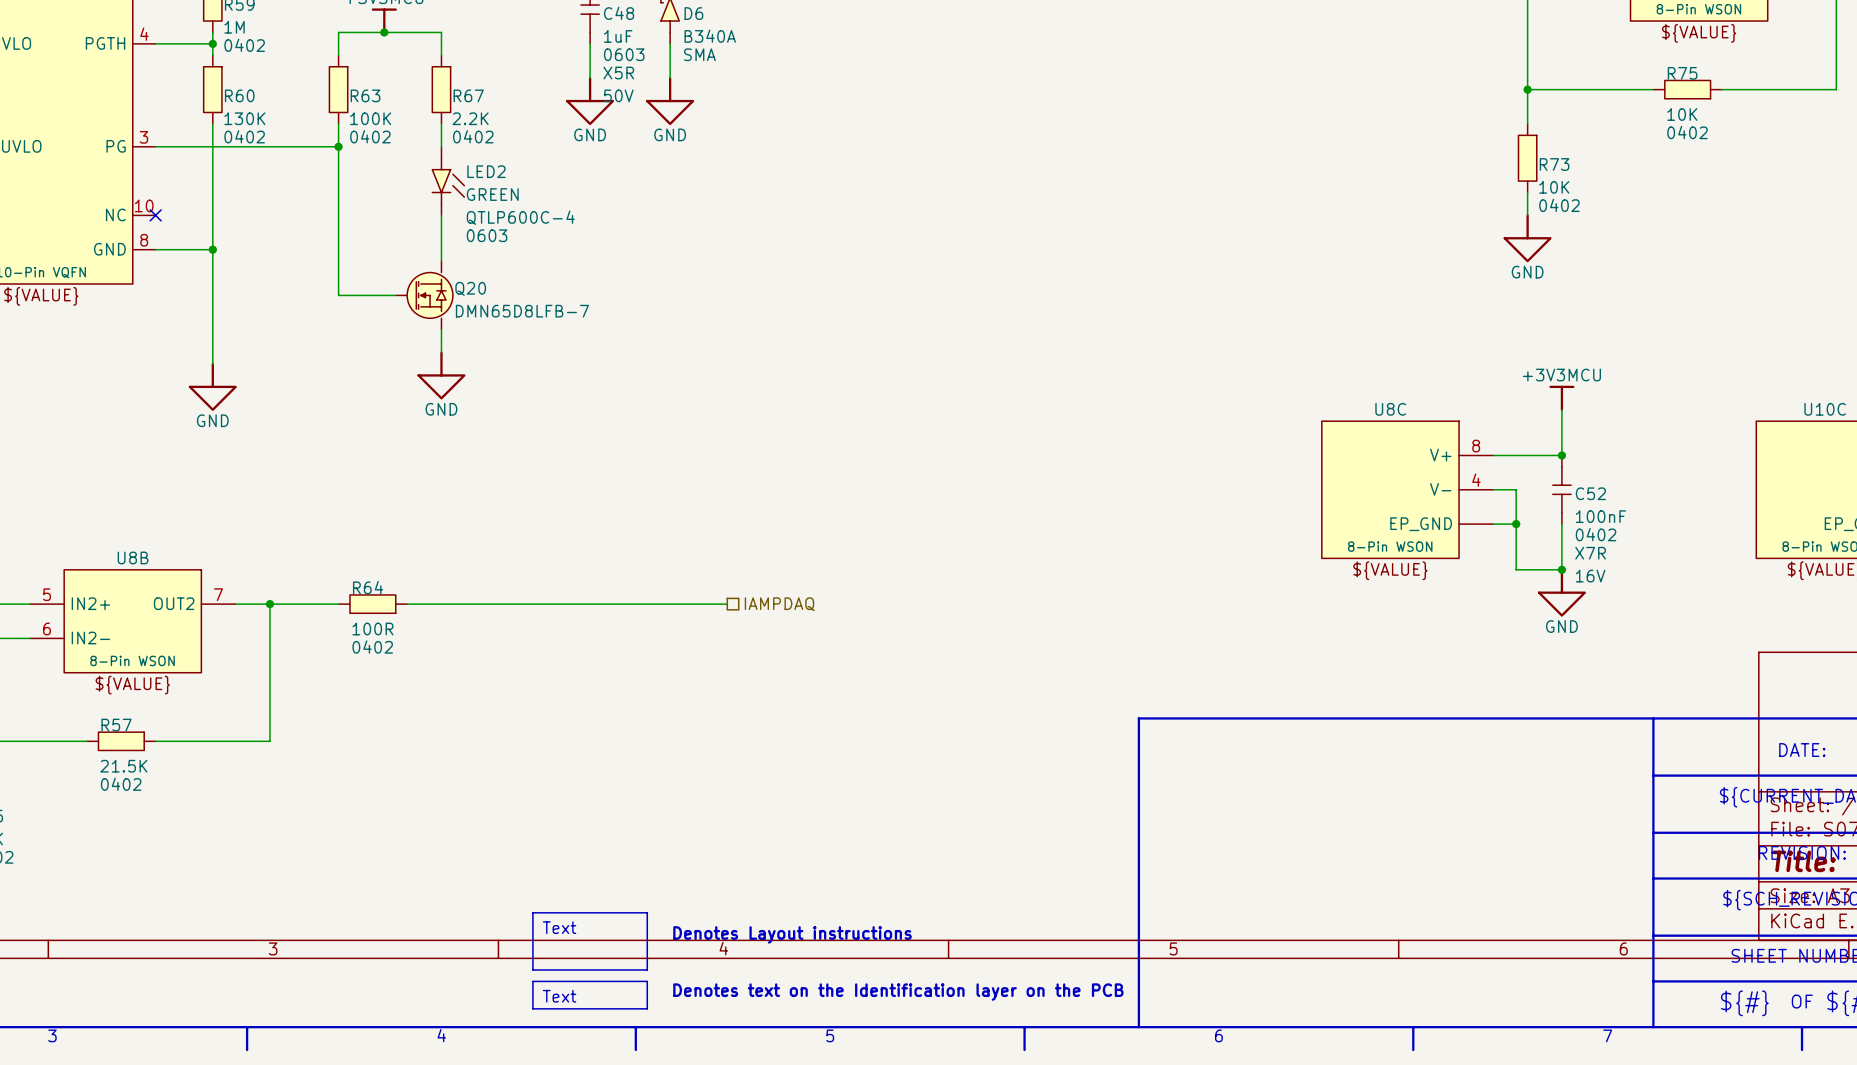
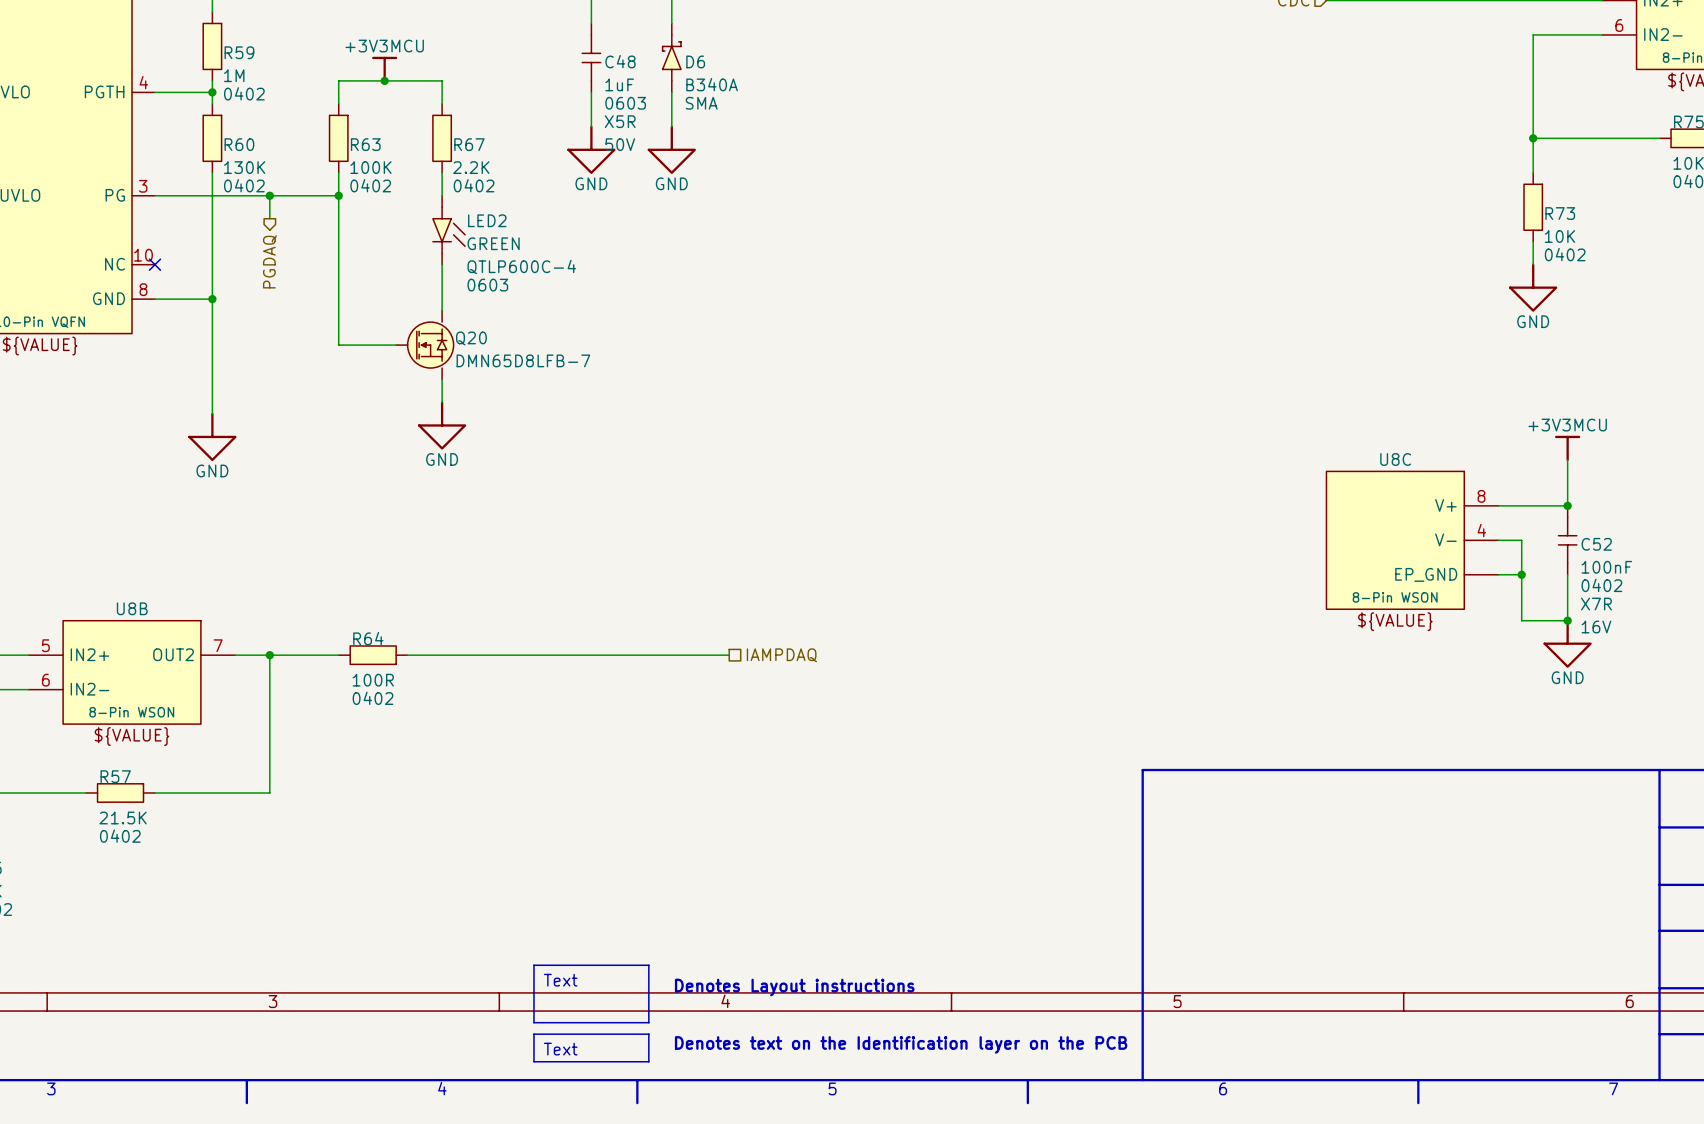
wire: none -> (269, 195) (269, 218)
junction: none -> (269, 195)
hierarchical label: none -> PGDAQ (269, 261)

